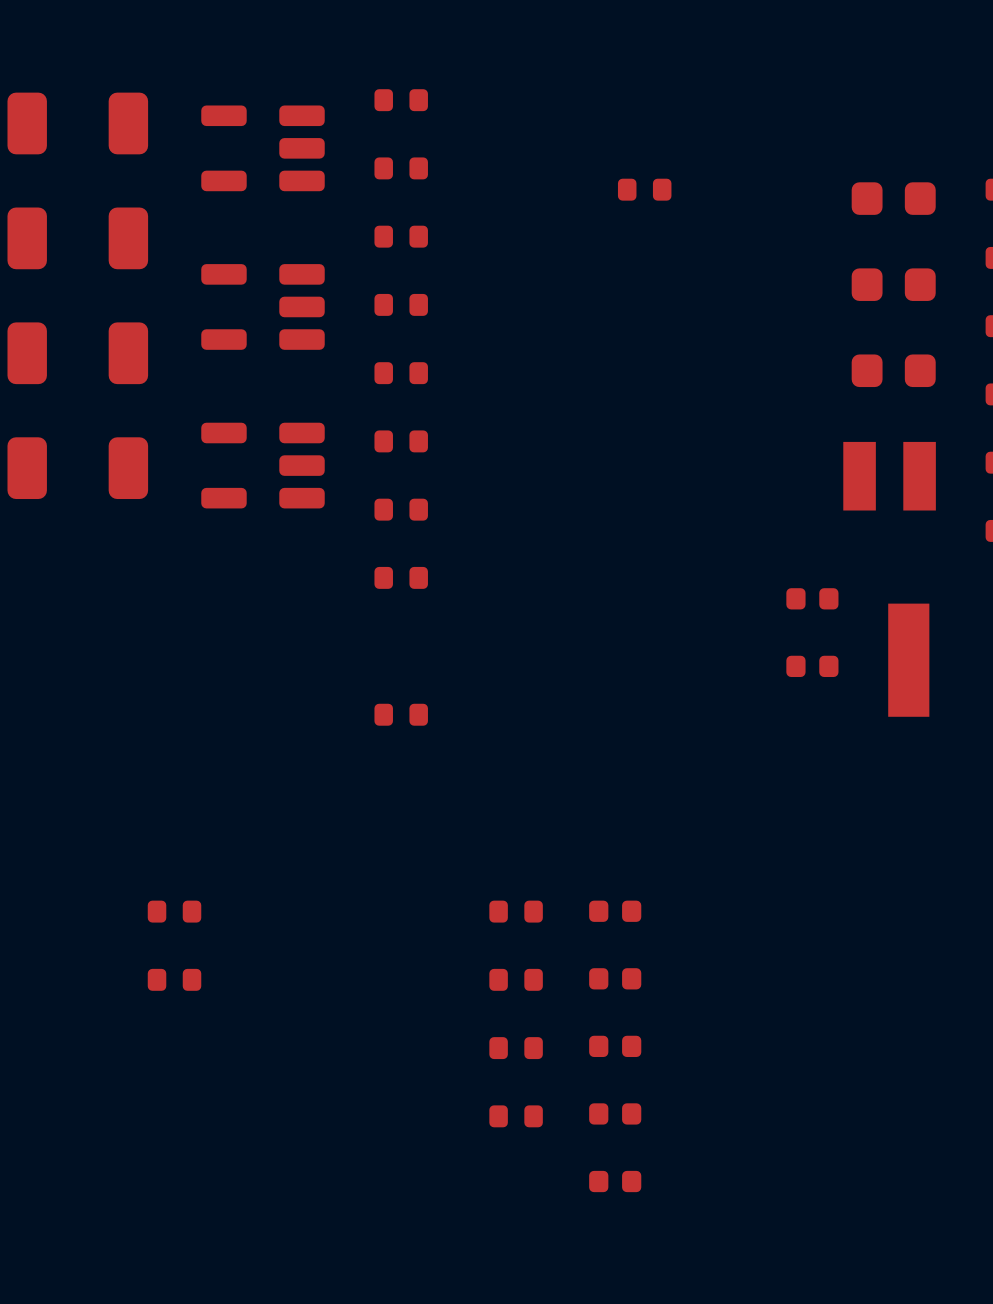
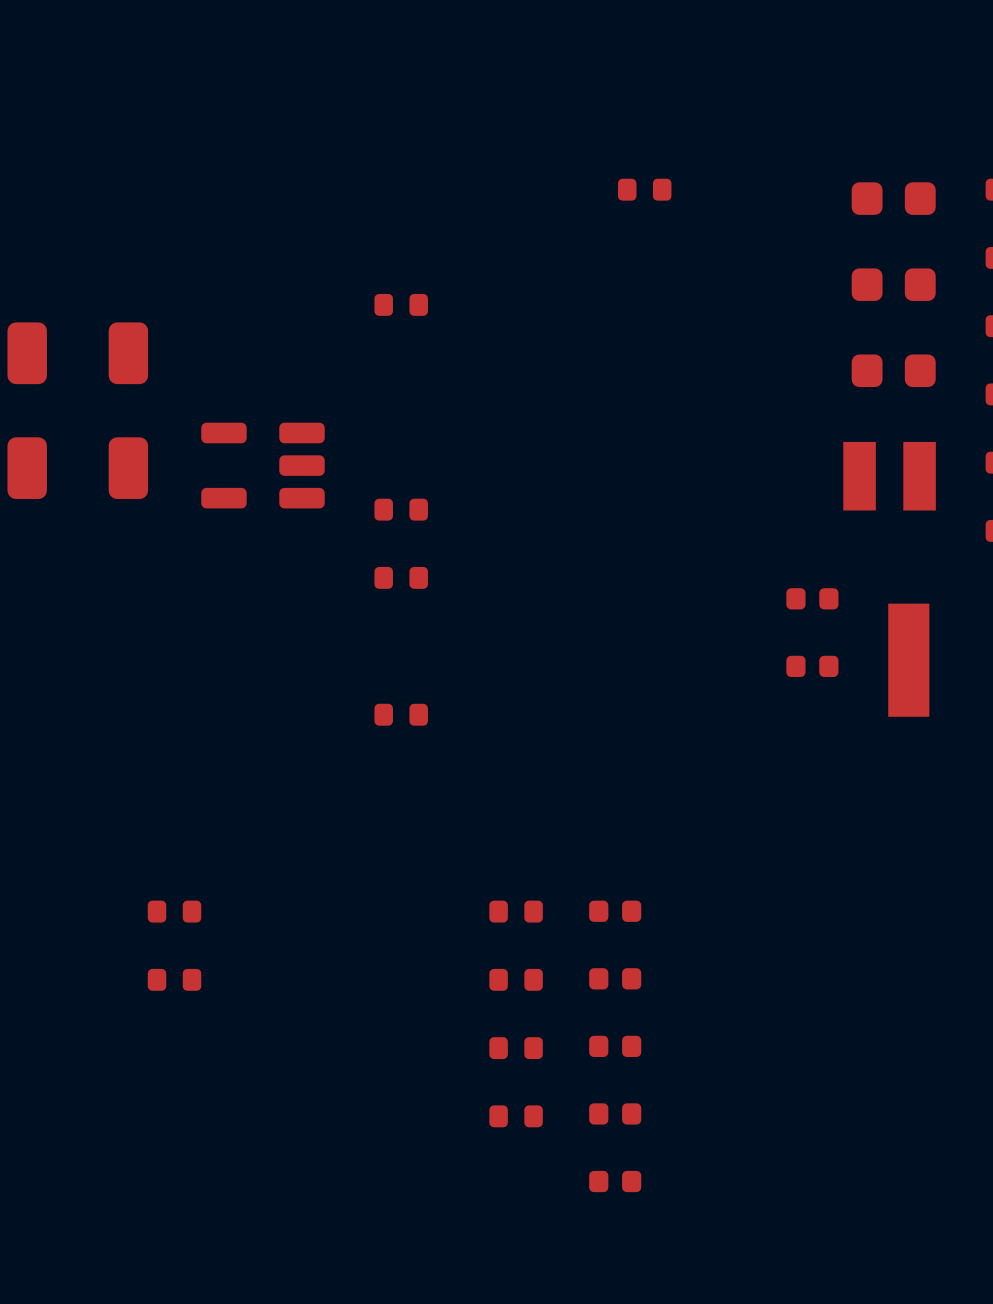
part: (401, 100) -> none
part: (77, 123) -> none
part: (262, 148) -> none
part: (401, 168) -> none
part: (401, 236) -> none
part: (77, 238) -> none
part: (262, 306) -> none
part: (401, 373) -> none
part: (401, 441) -> none

